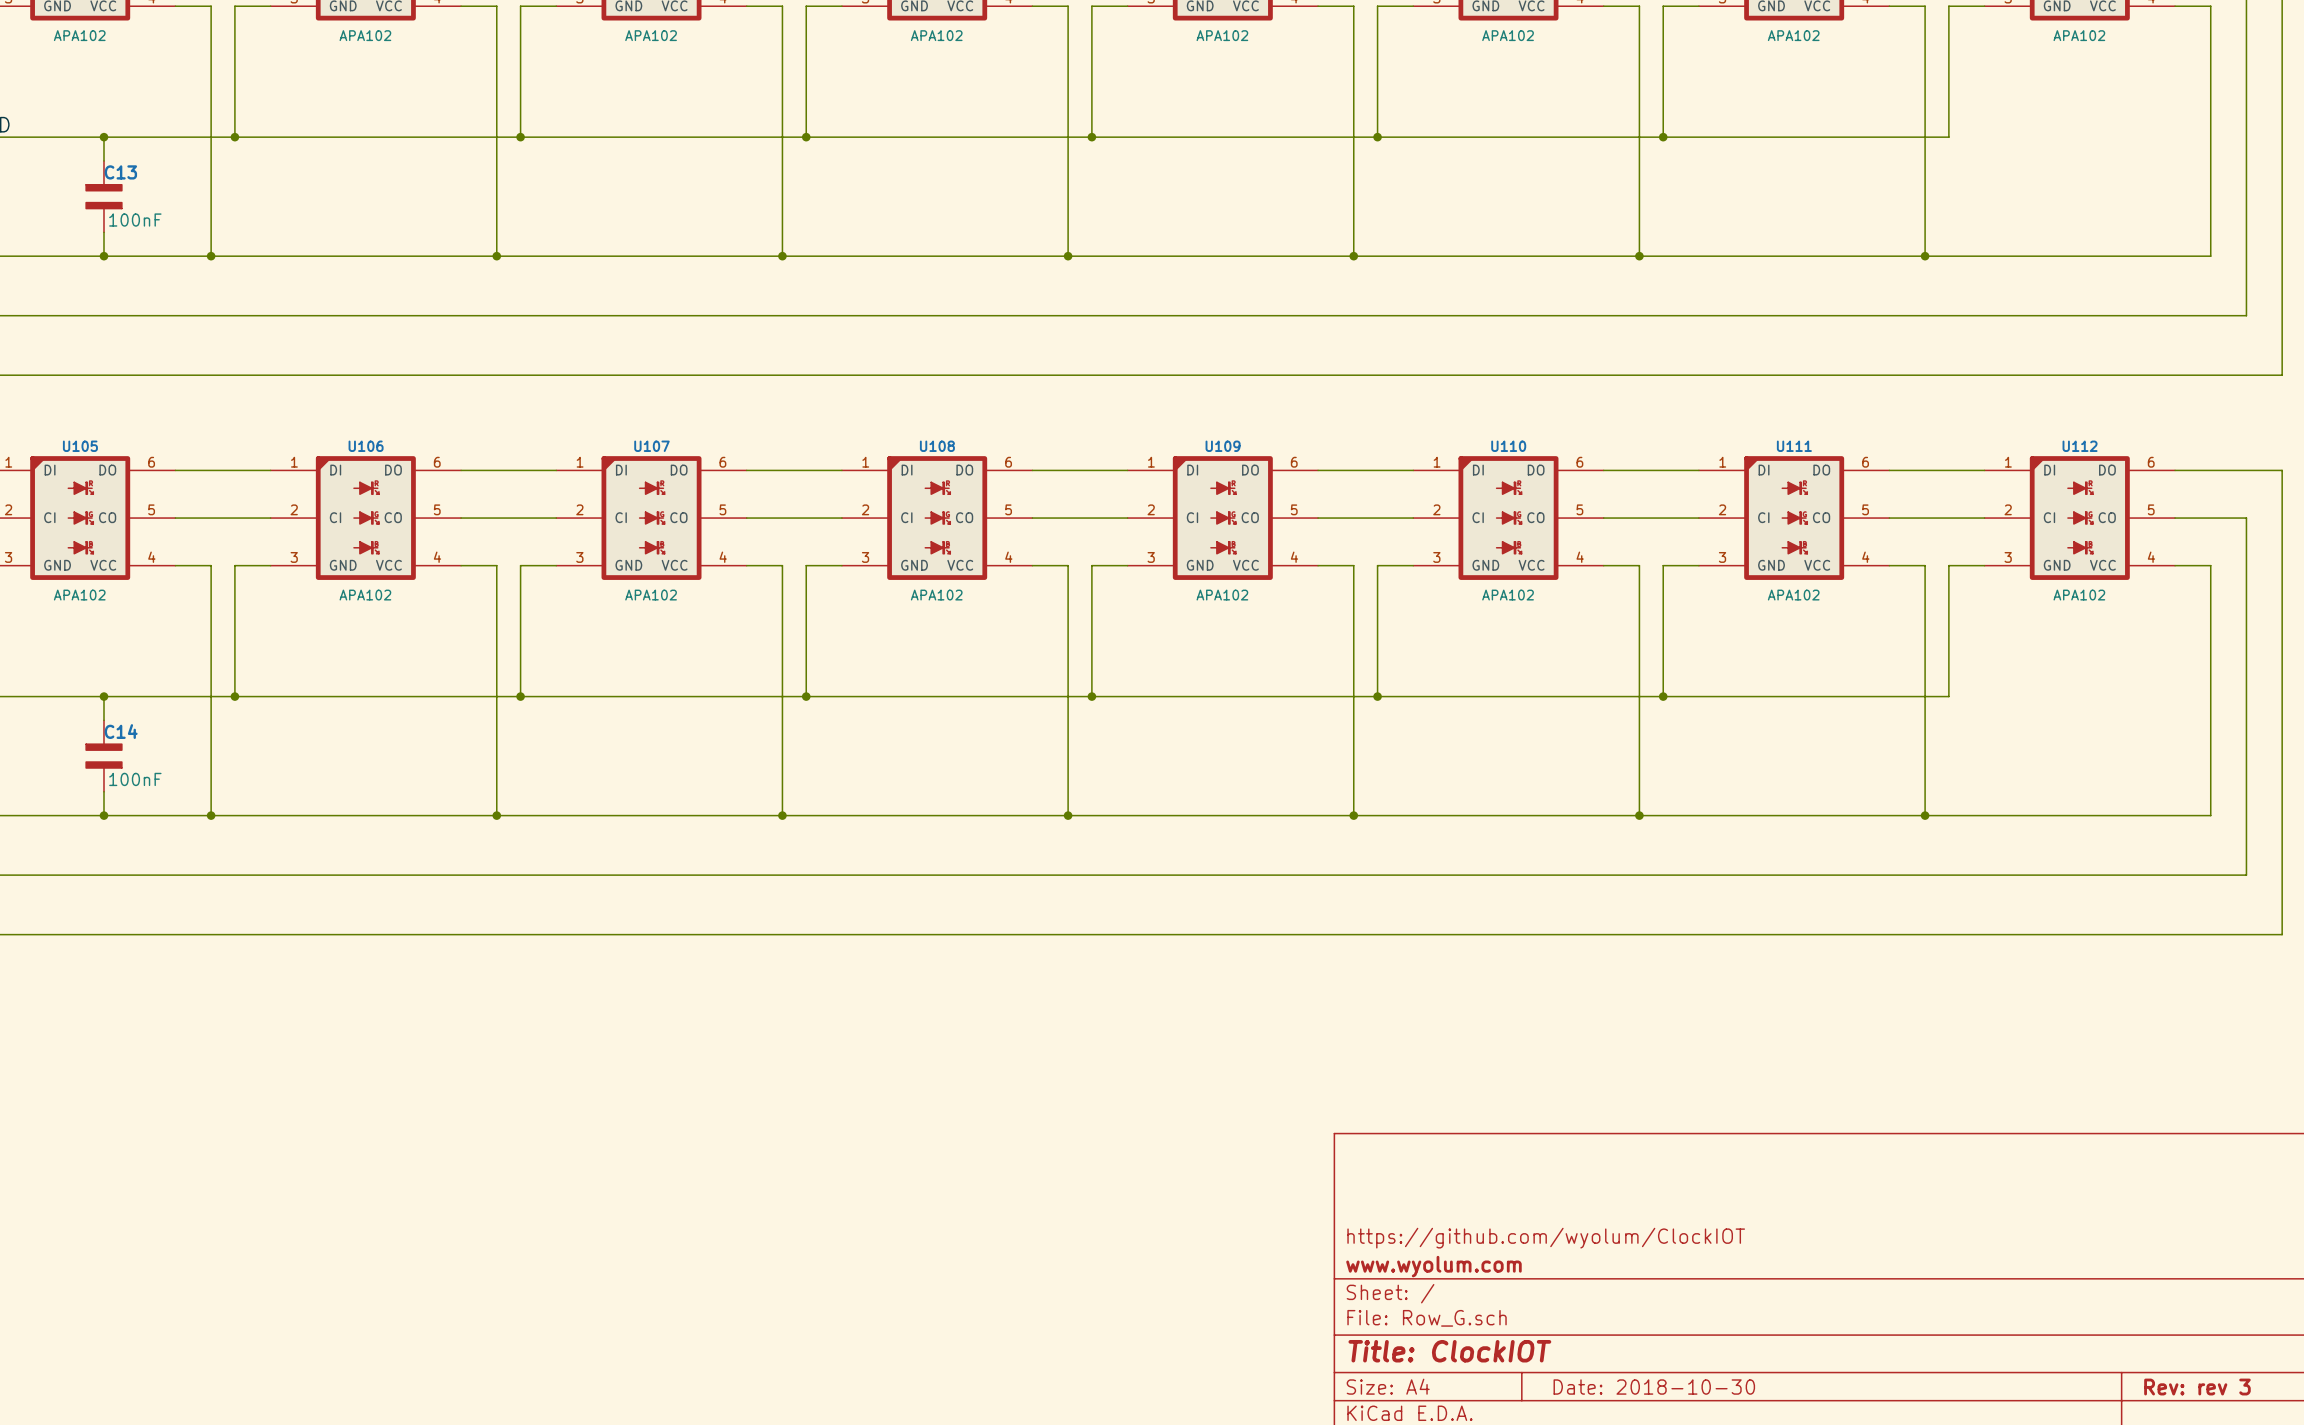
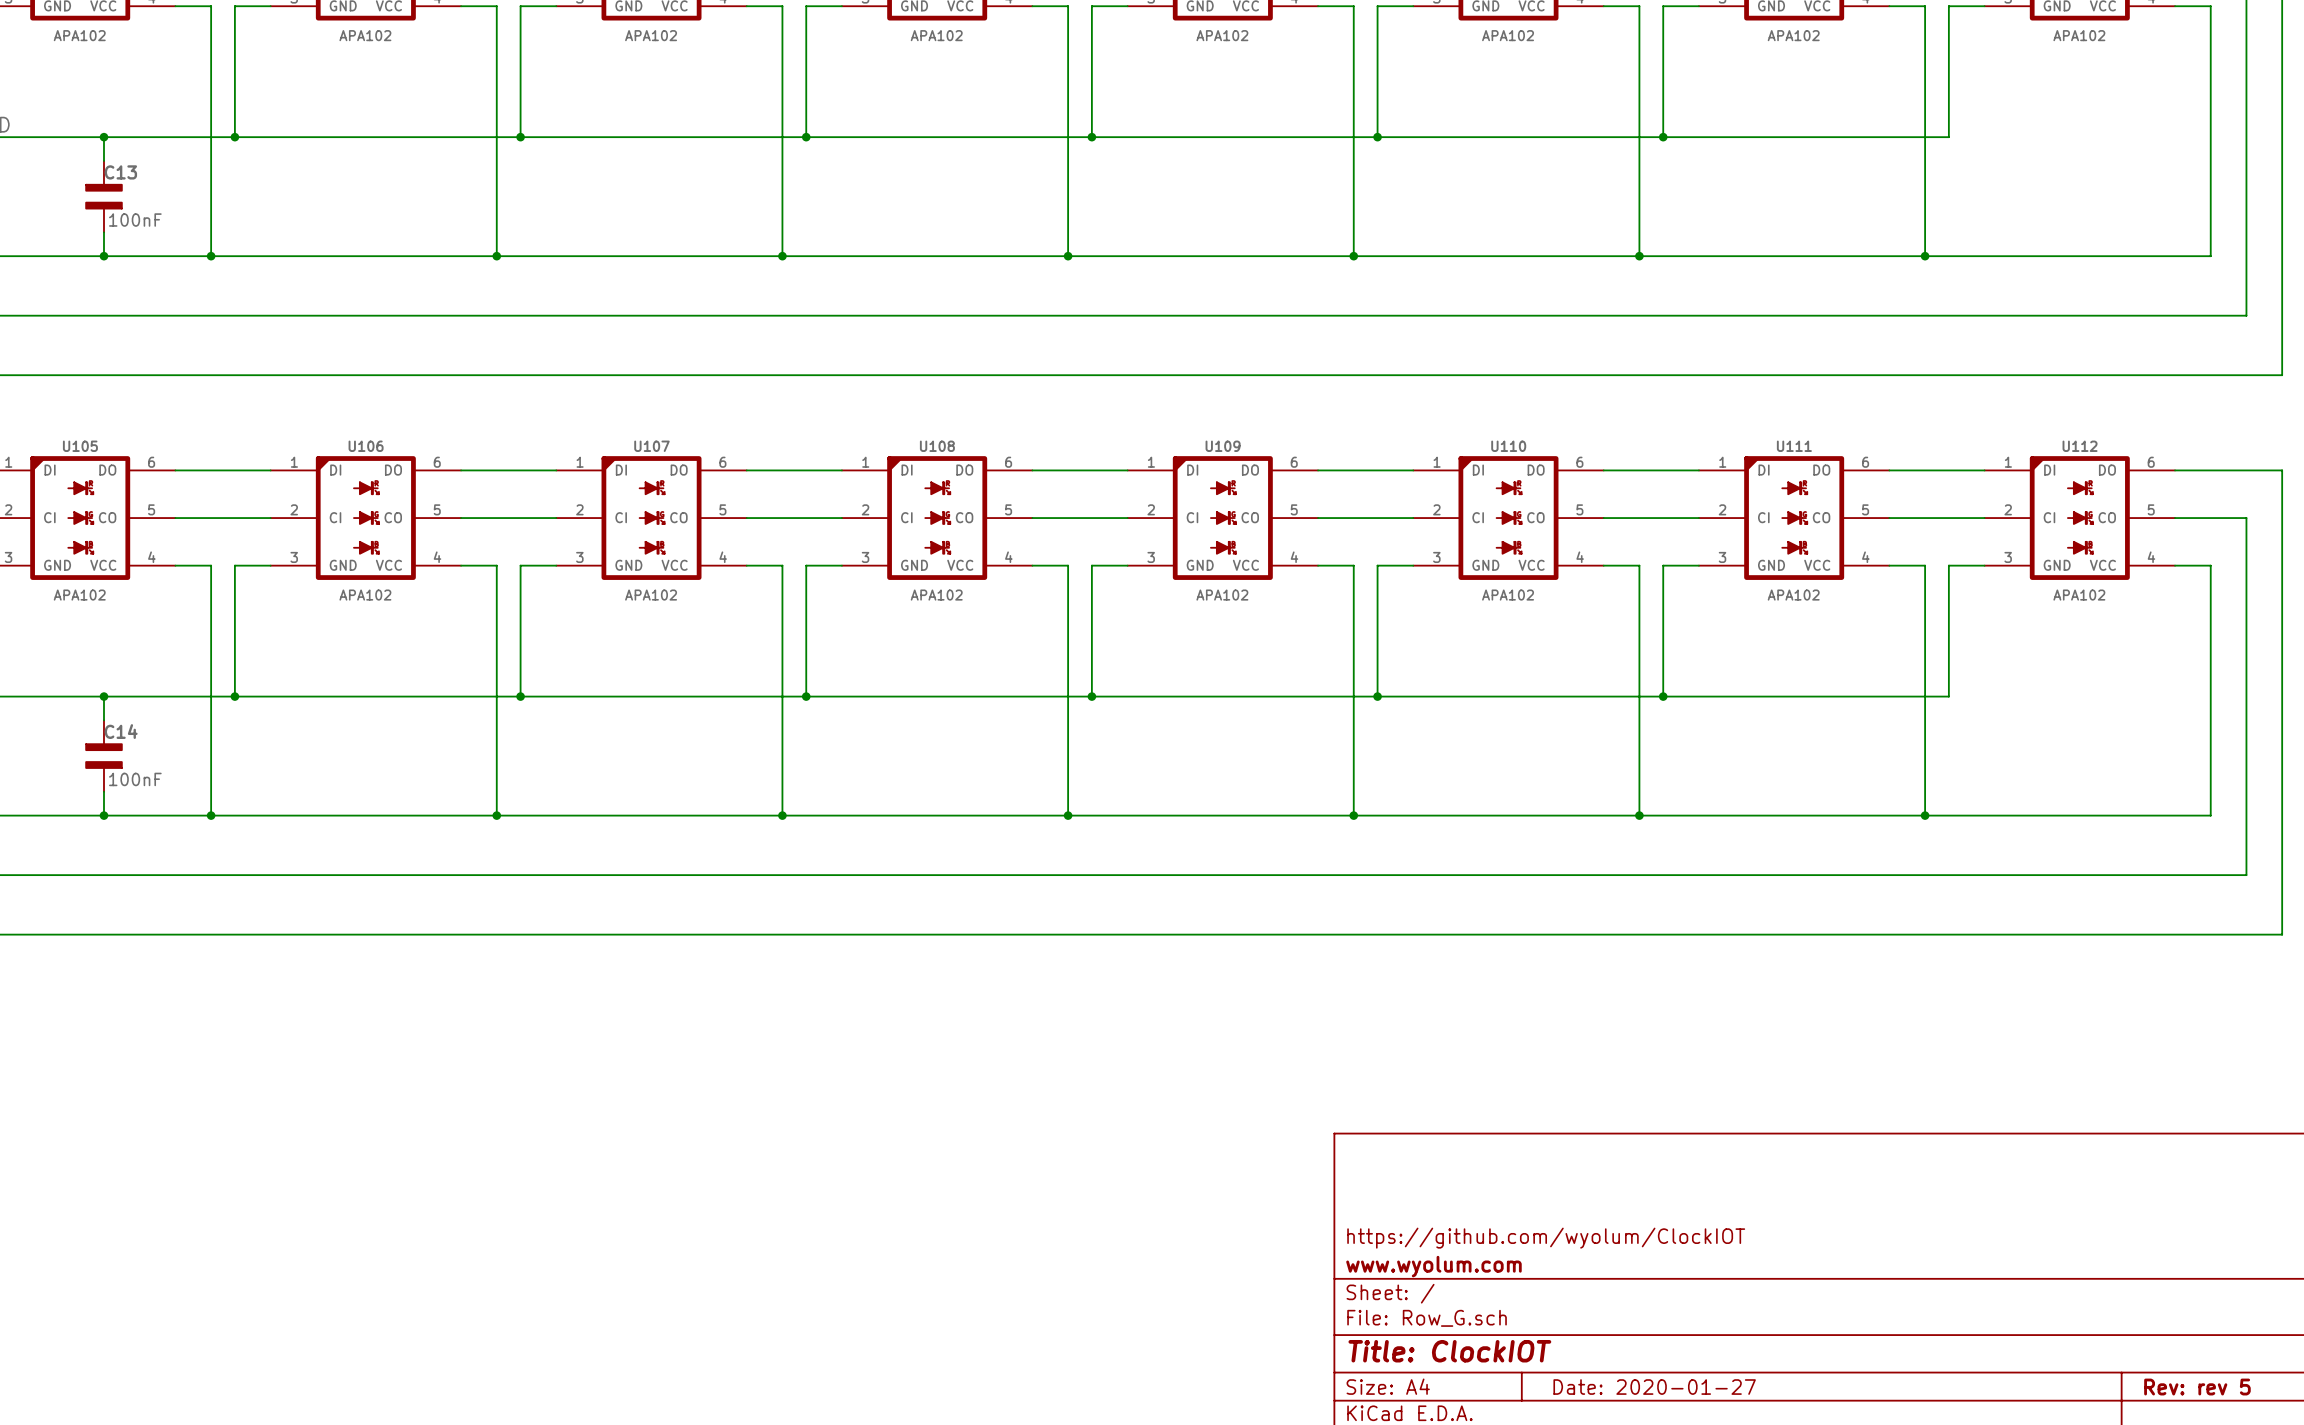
title block: Date: 2018-10-30 (1654, 1387) -> Date: 2020-01-27 (1654, 1387)
title block: Rev: rev 3 (2197, 1387) -> Rev: rev 5 (2197, 1387)

